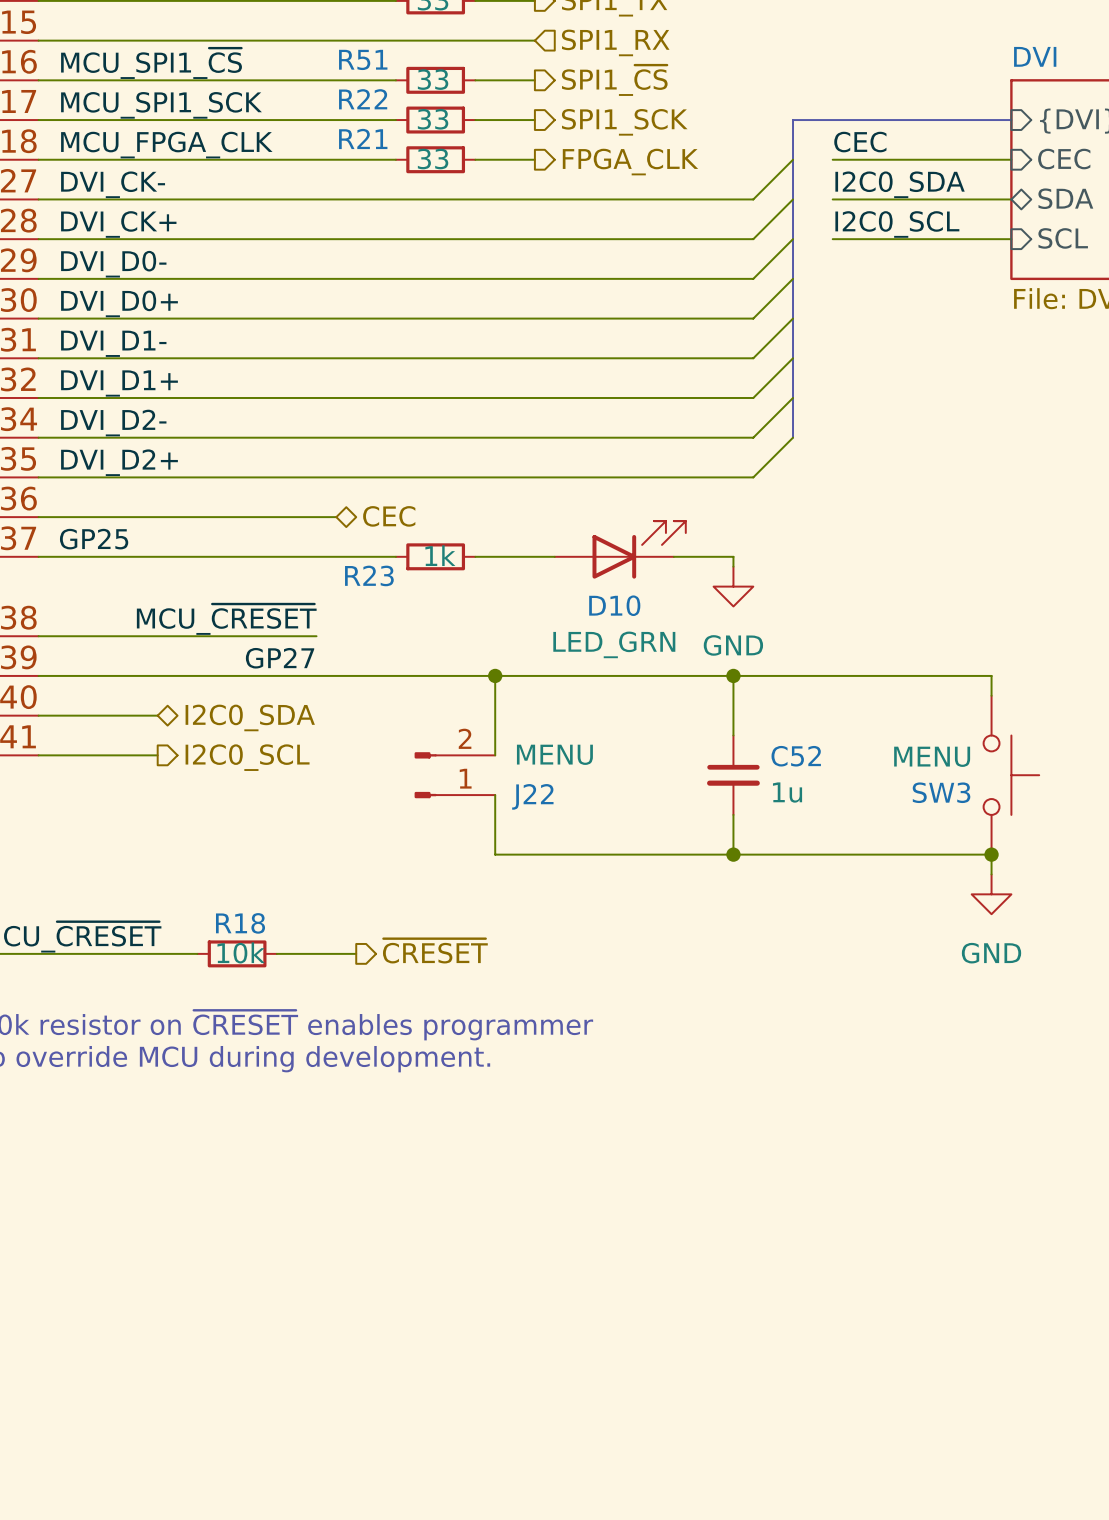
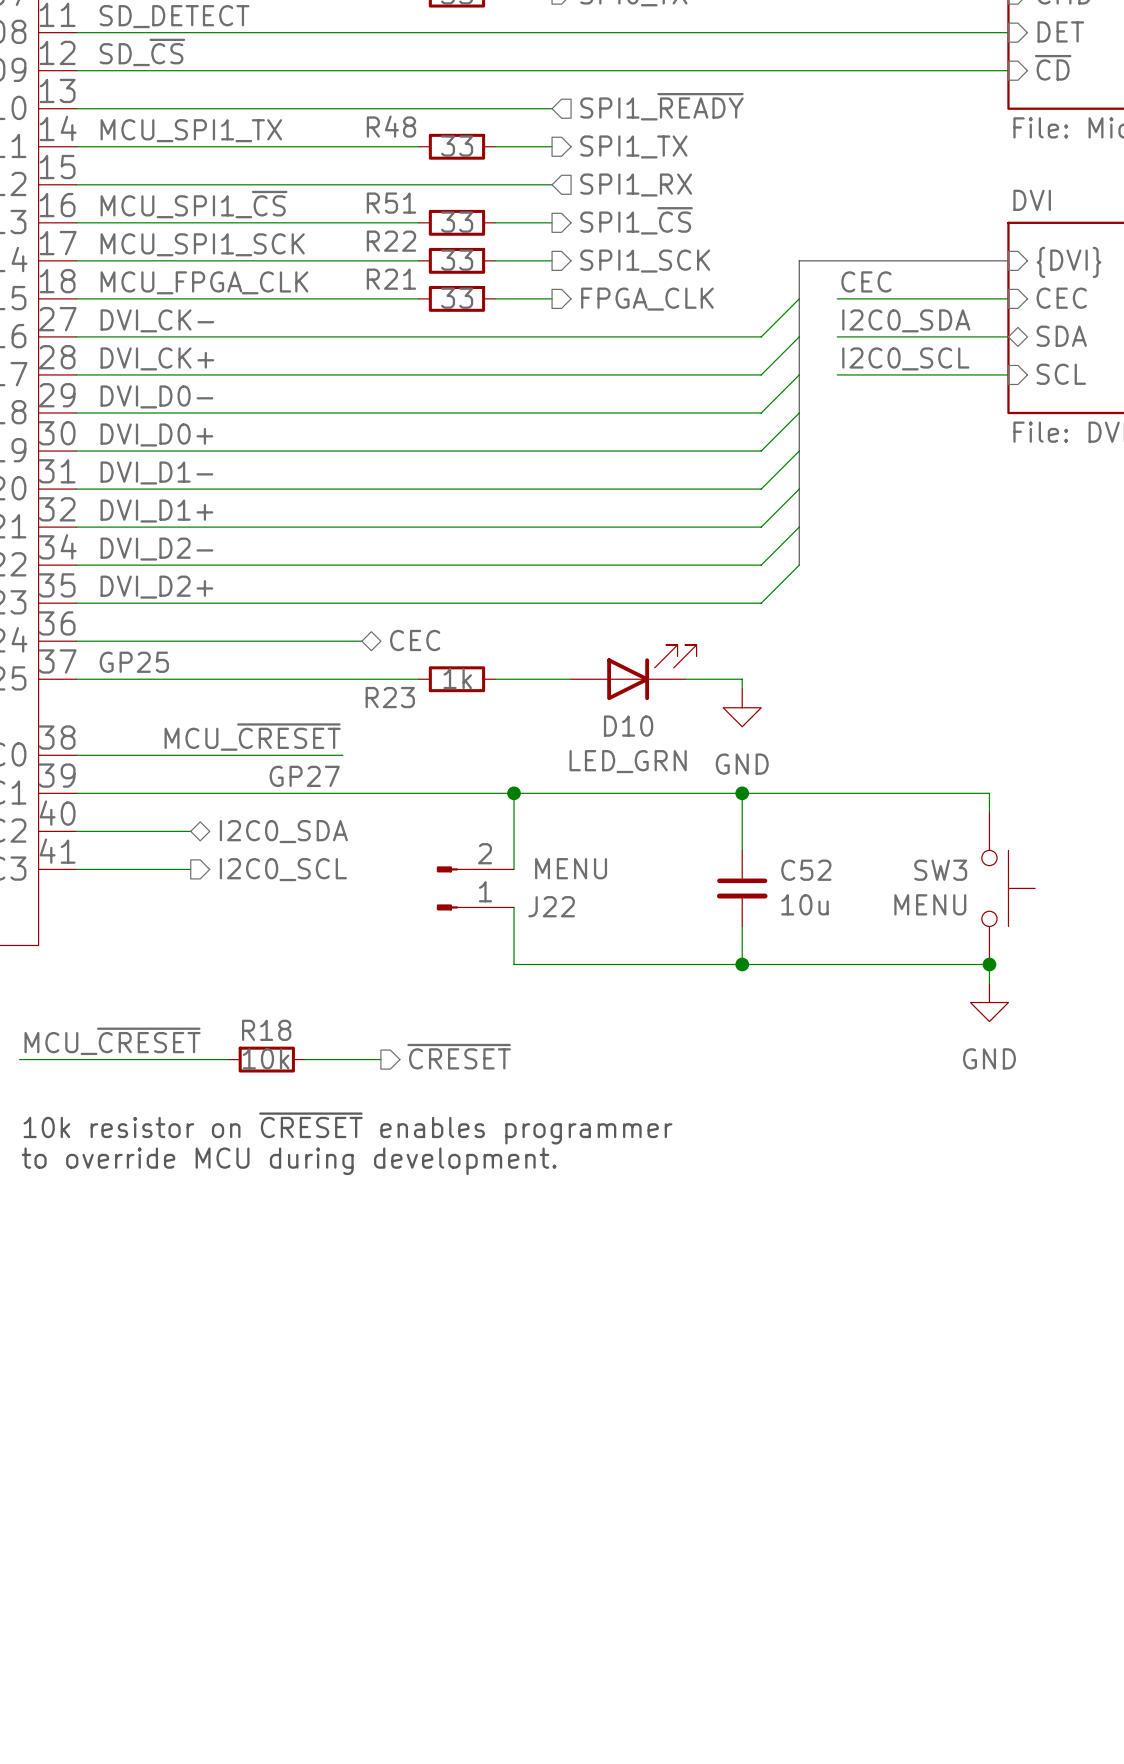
SW3 value position: MENU (932, 756) -> MENU (930, 904)
C52 value: 1u (787, 792) -> 10u (804, 904)
SW3 name position: SW3 (941, 792) -> SW3 (940, 870)

